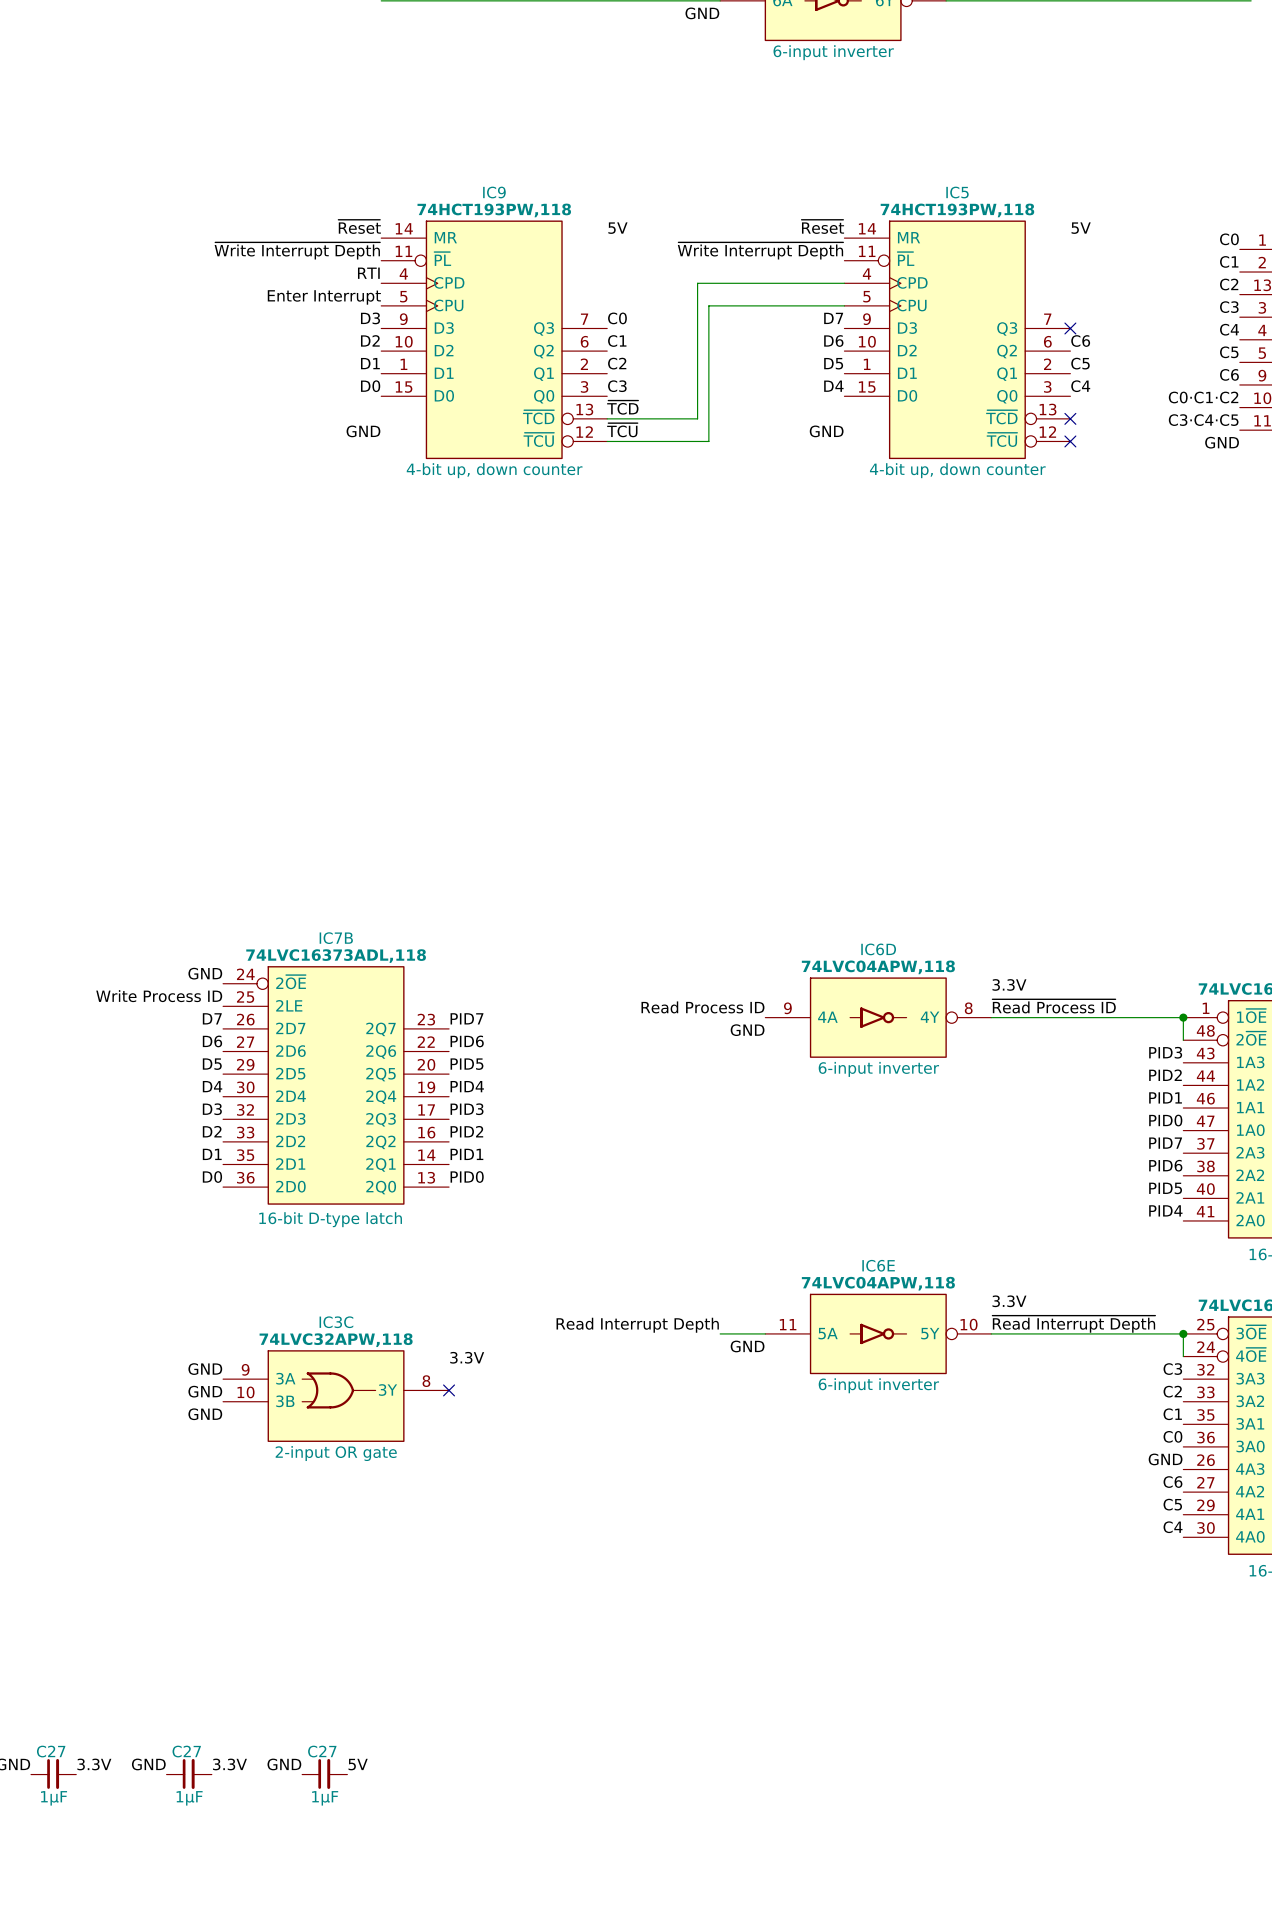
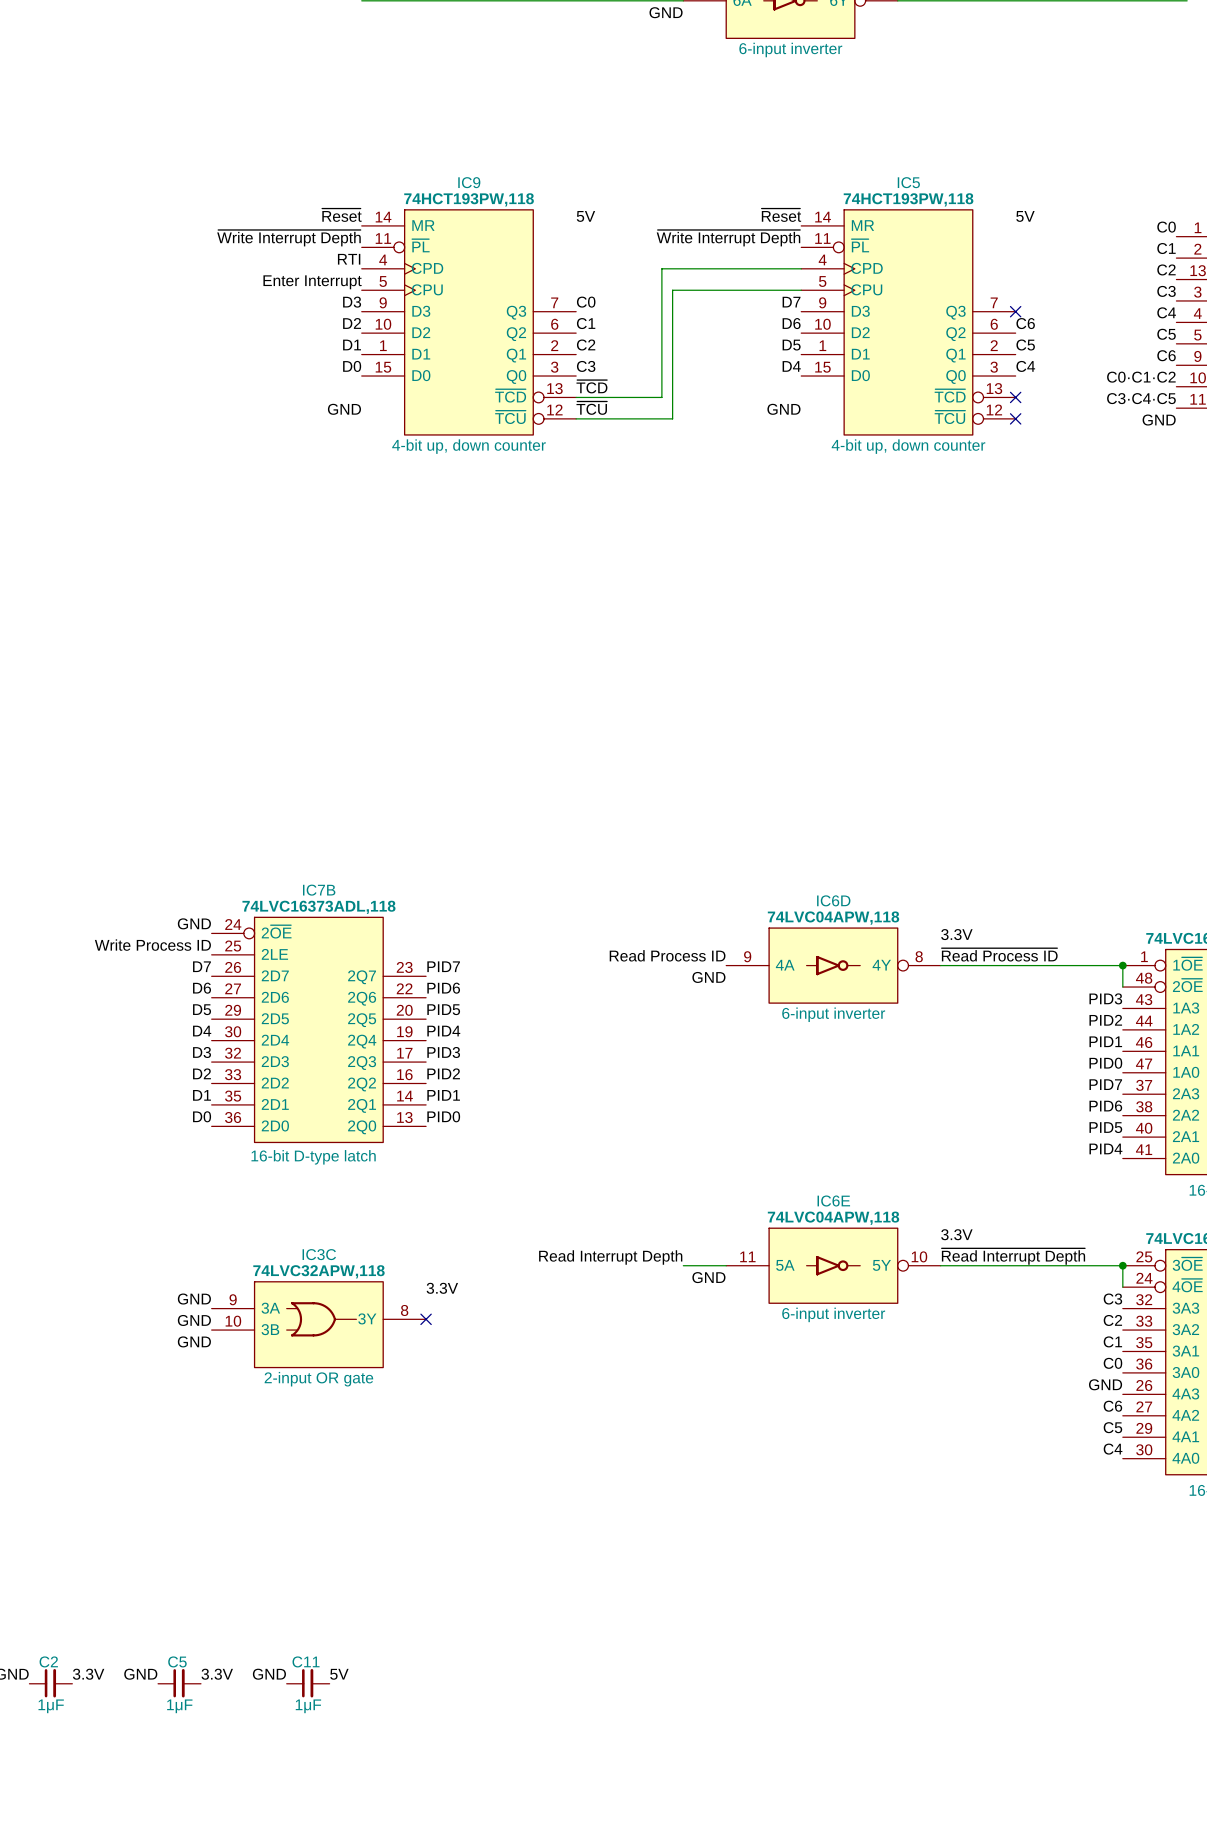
C27 name: C27 (51, 1751) -> C2 (48, 1661)
C27 name: C27 (186, 1751) -> C5 (177, 1661)
C27 name: C27 (322, 1751) -> C11 (306, 1661)

